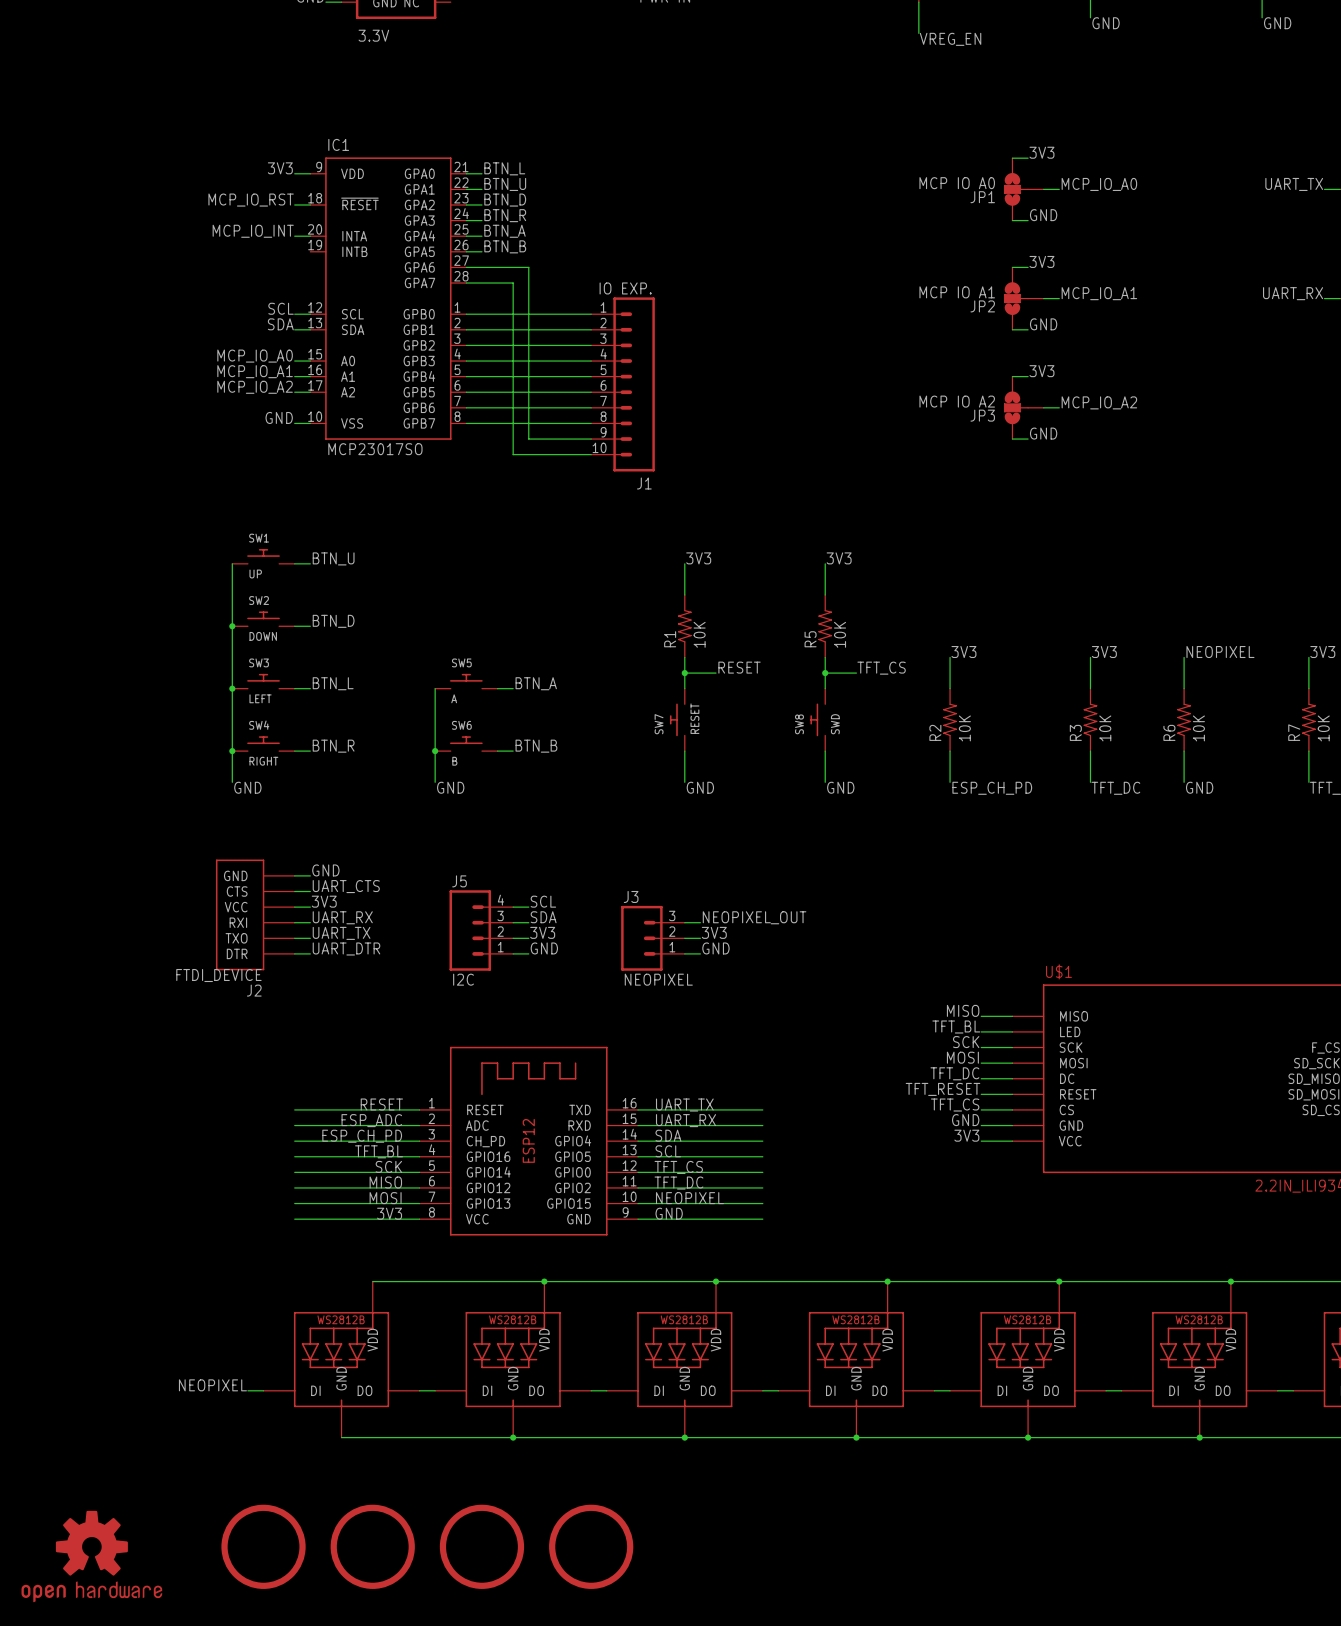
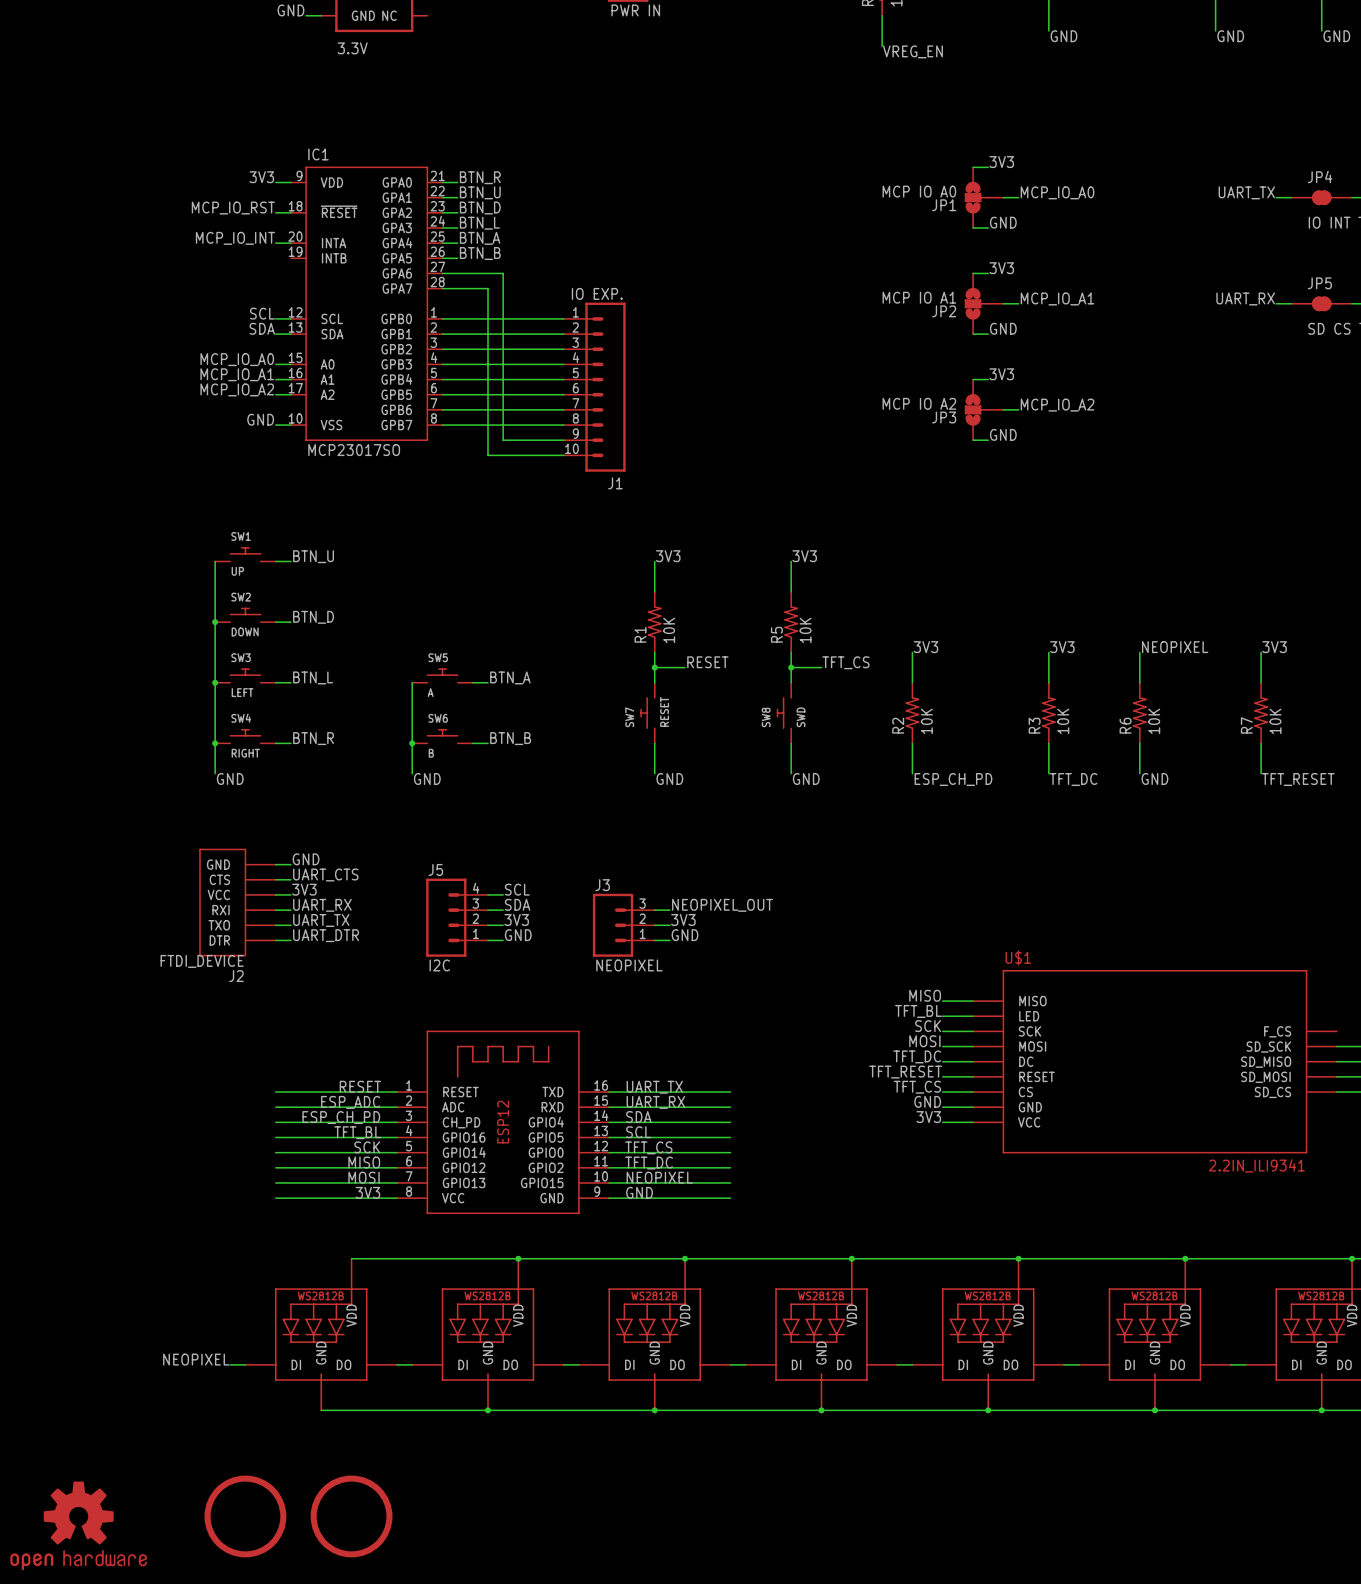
label: BTN_L (504, 168) -> BTN_R (480, 177)
label: BTN_R (505, 215) -> BTN_L (479, 223)
part: (481, 1546) -> none
part: (591, 1546) -> none

